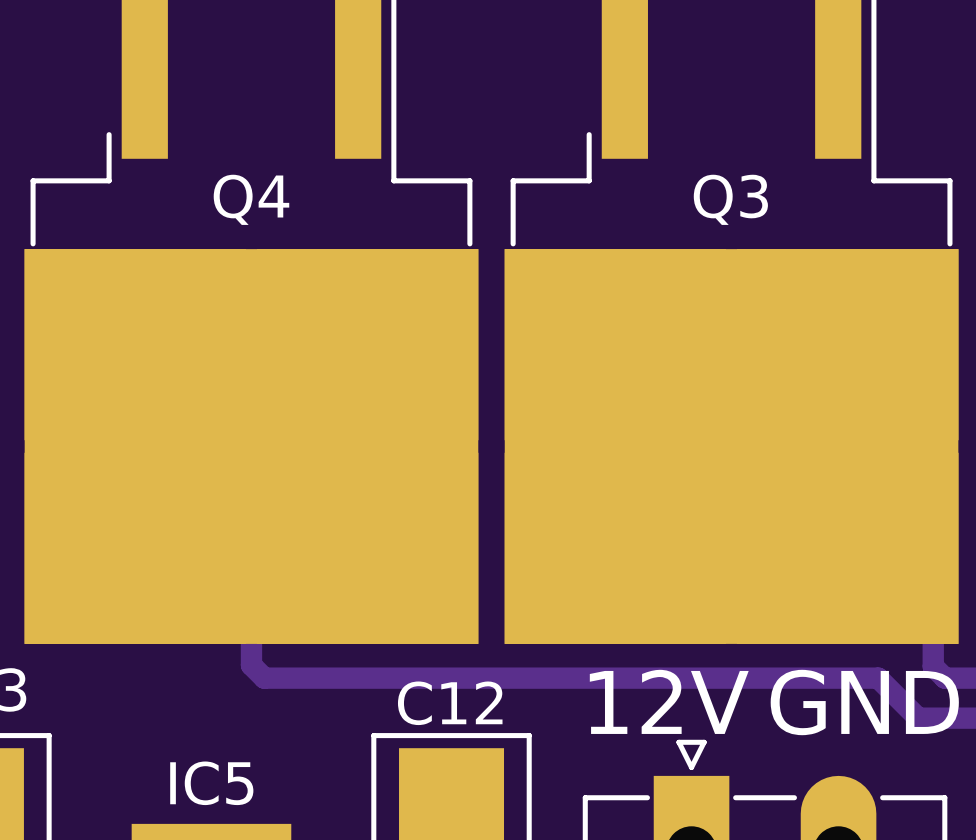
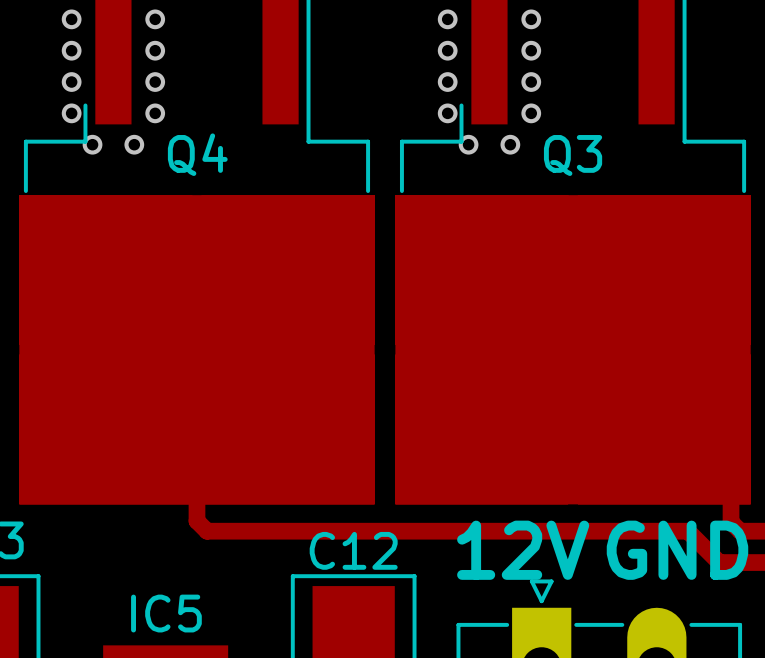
via: none -> (71, 19)
via: none -> (155, 19)
via: none -> (447, 19)
via: none -> (531, 19)
via: none -> (71, 50)
via: none -> (155, 50)
via: none -> (447, 50)
via: none -> (531, 50)
via: none -> (71, 82)
via: none -> (155, 82)
via: none -> (447, 82)
via: none -> (531, 82)
via: none -> (71, 113)
via: none -> (155, 113)
via: none -> (447, 113)
via: none -> (531, 113)
via: none -> (92, 144)
via: none -> (134, 144)
via: none -> (468, 144)
via: none -> (510, 144)

